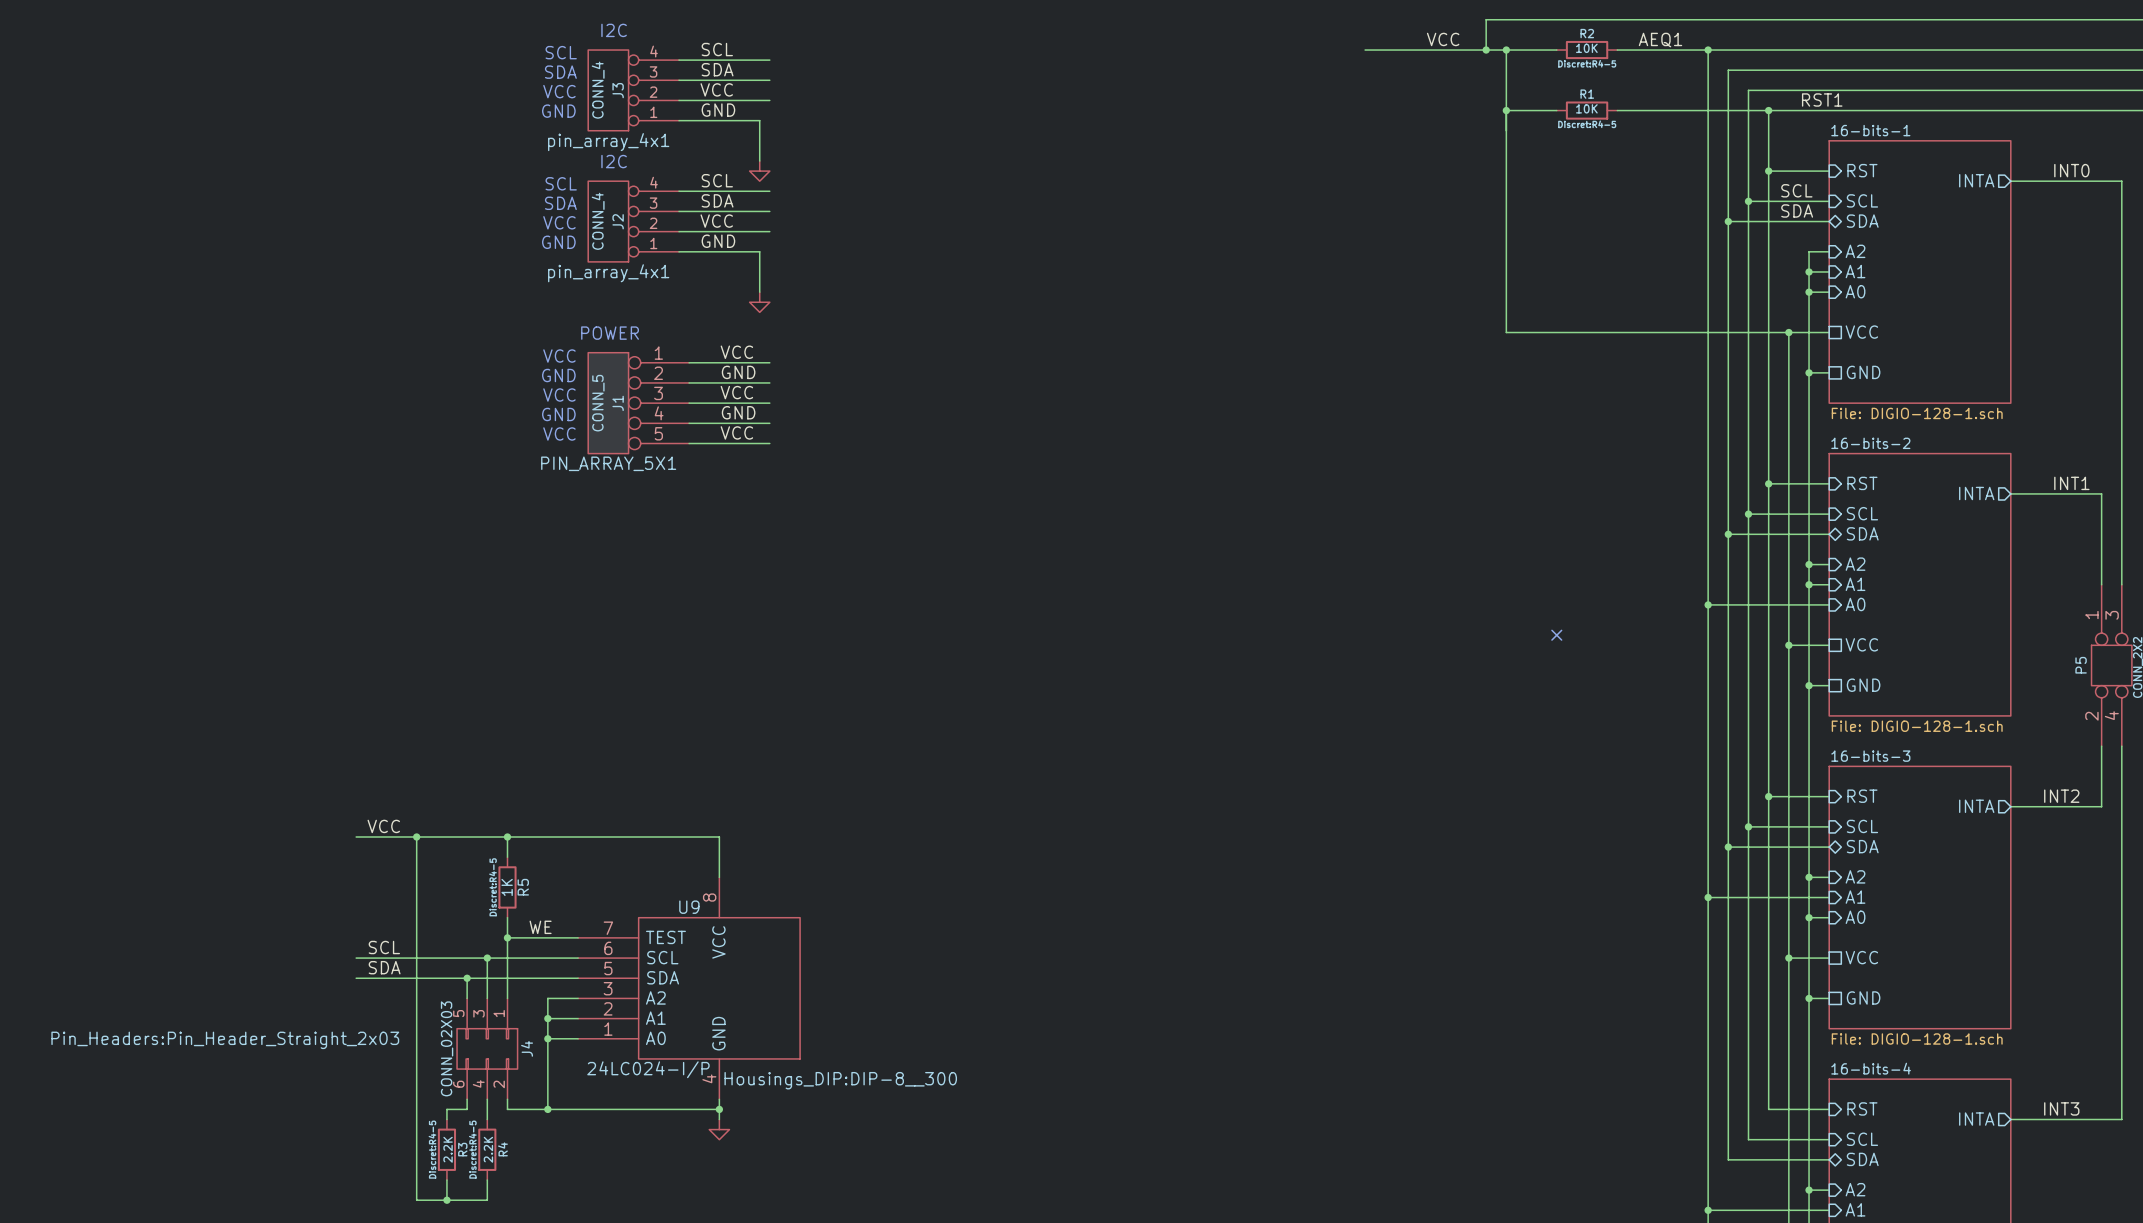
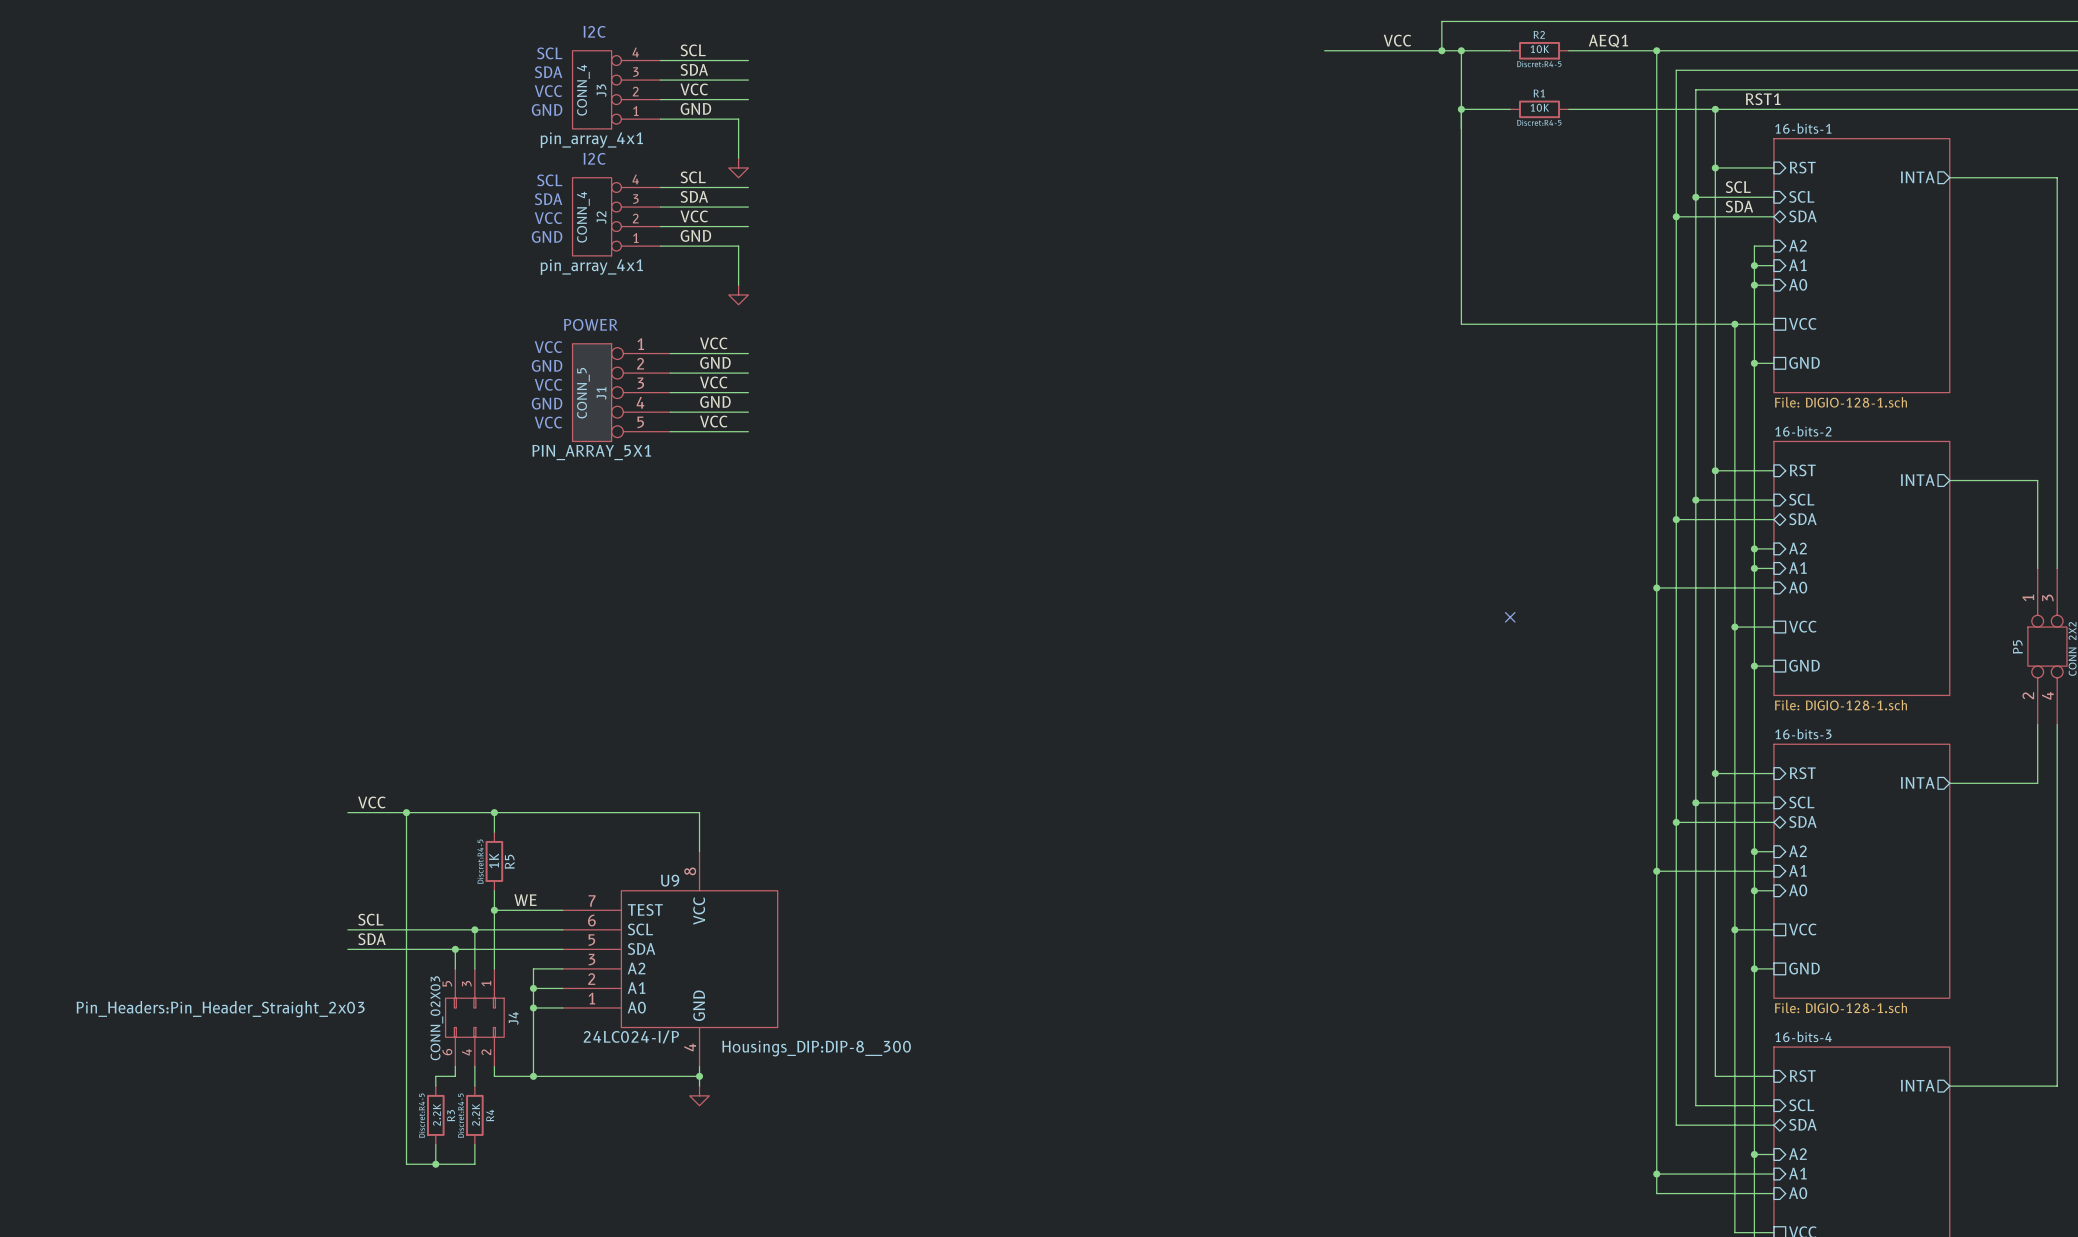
label: INT0 (2071, 170) -> none
label: INT1 (2071, 483) -> none
label: INT2 (2061, 796) -> none
label: INT3 (2061, 1108) -> none

